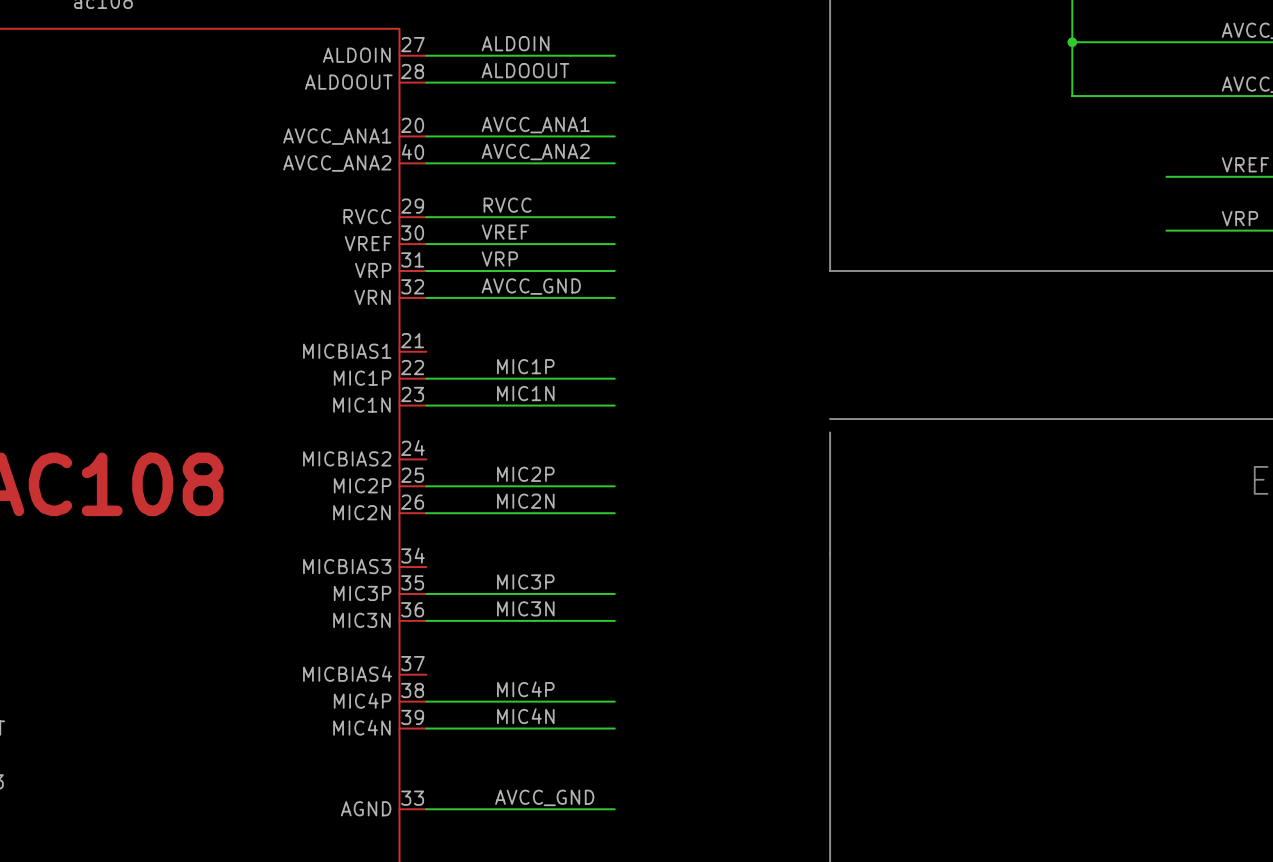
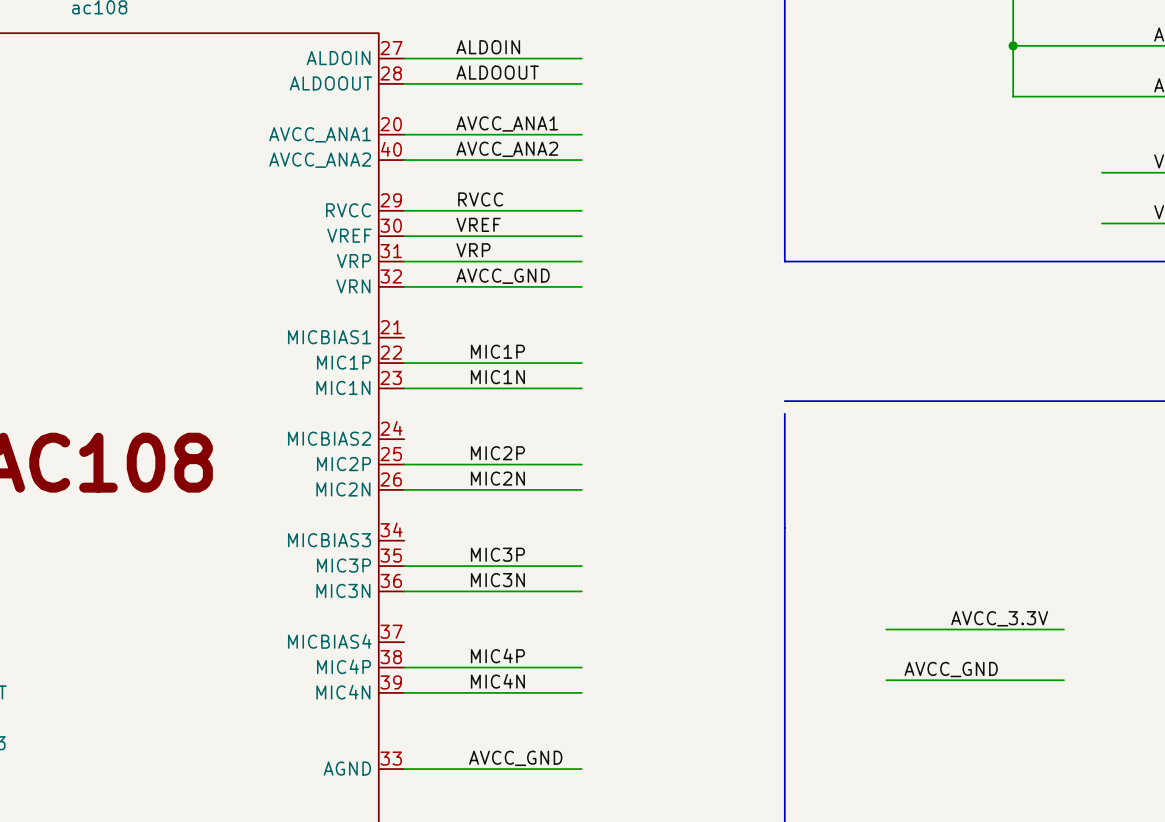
label: none -> AVCC_3.3V (999, 618)
wire: none -> (886, 629) (1063, 629)
label: none -> AVCC_GND (951, 669)
wire: none -> (886, 680) (1063, 680)

